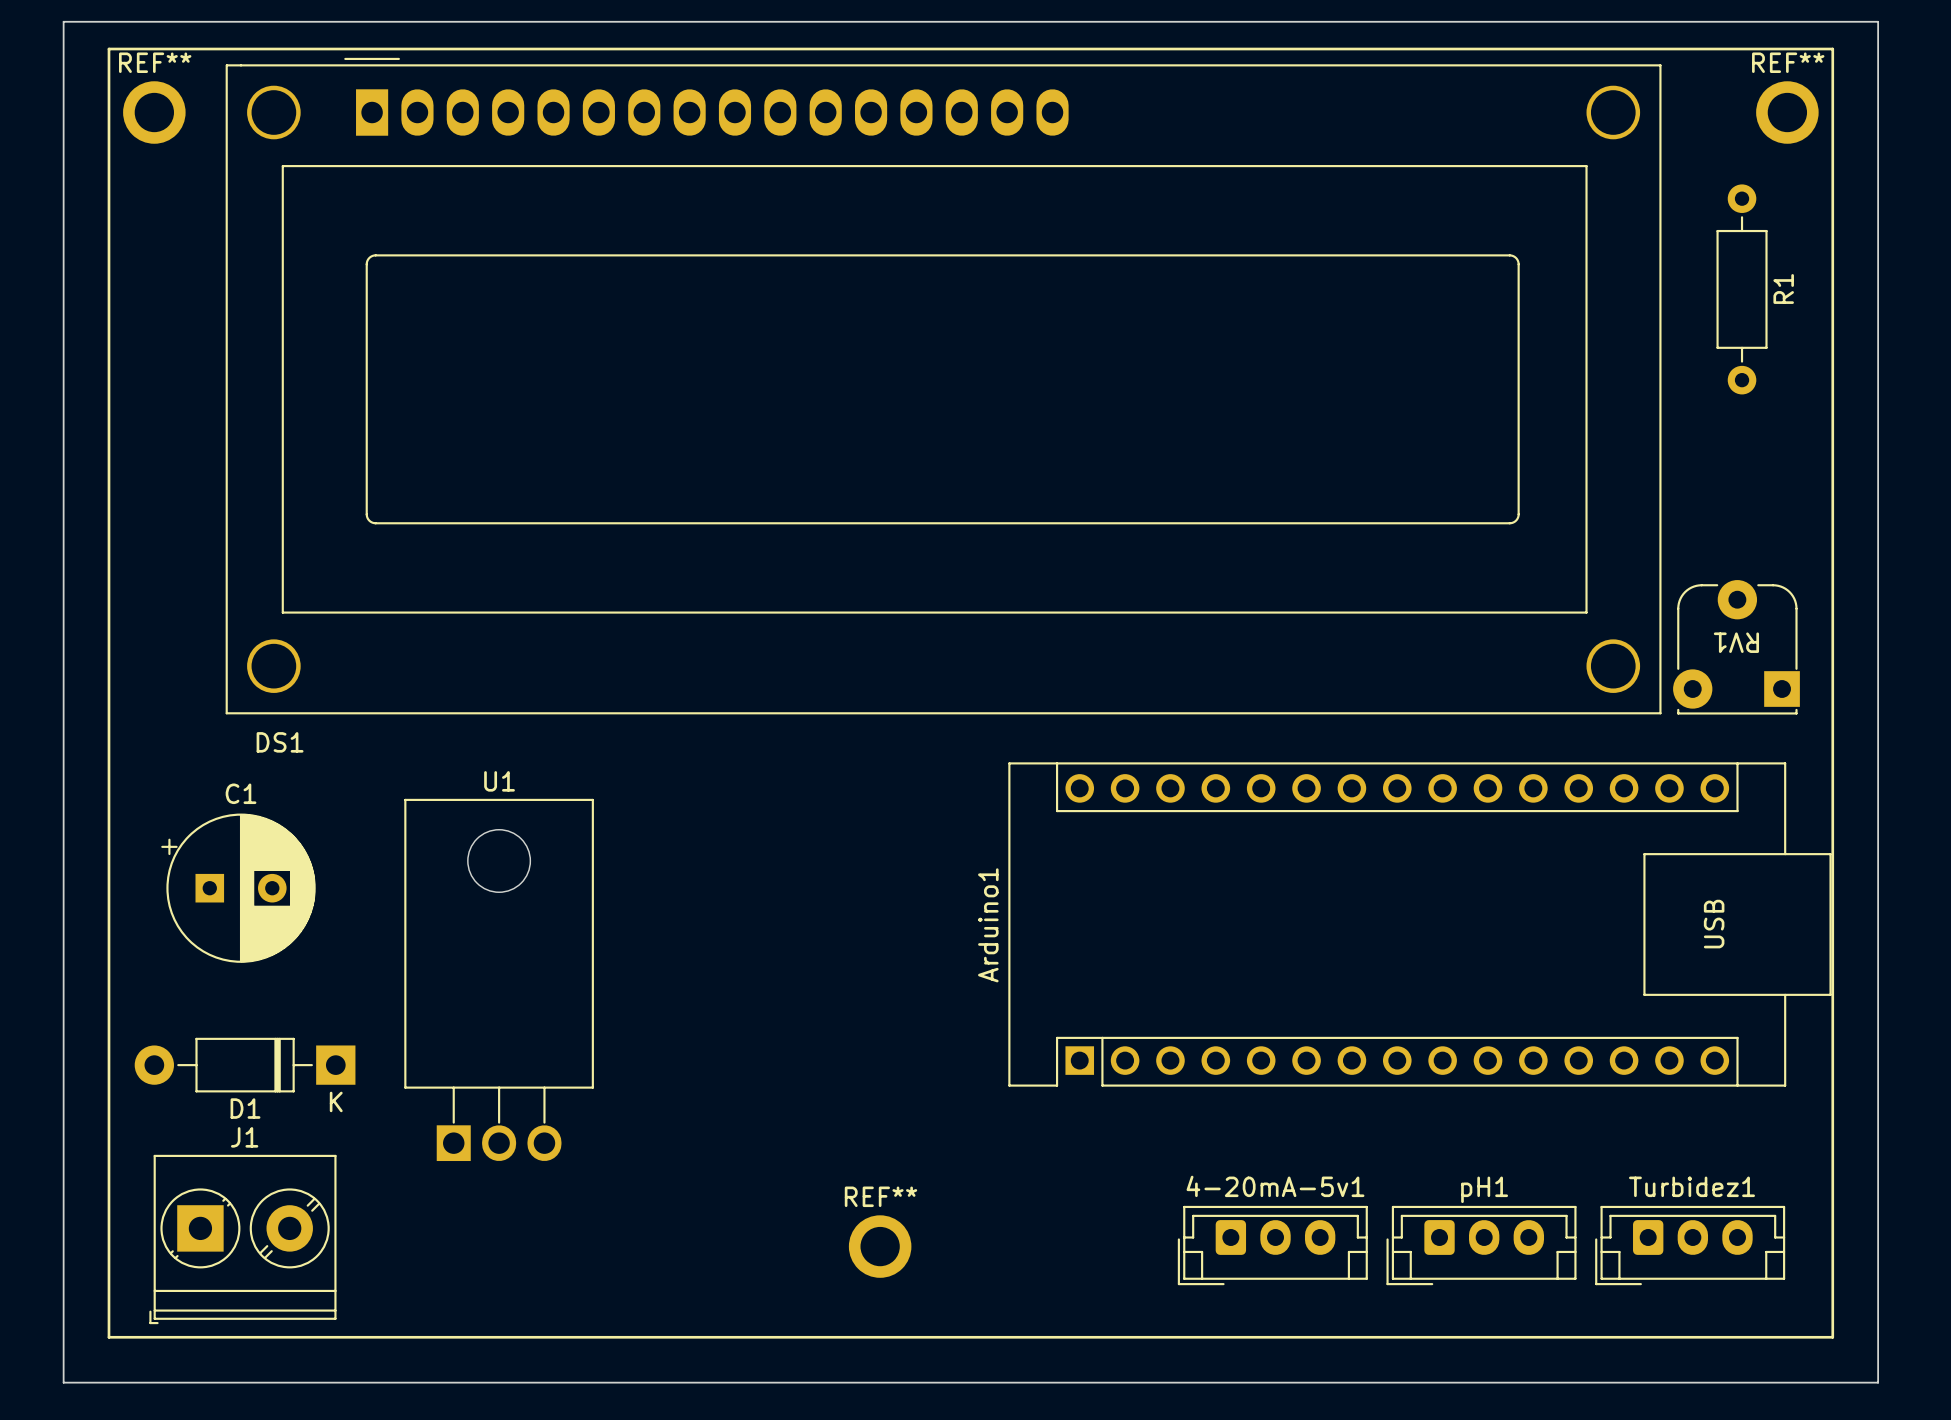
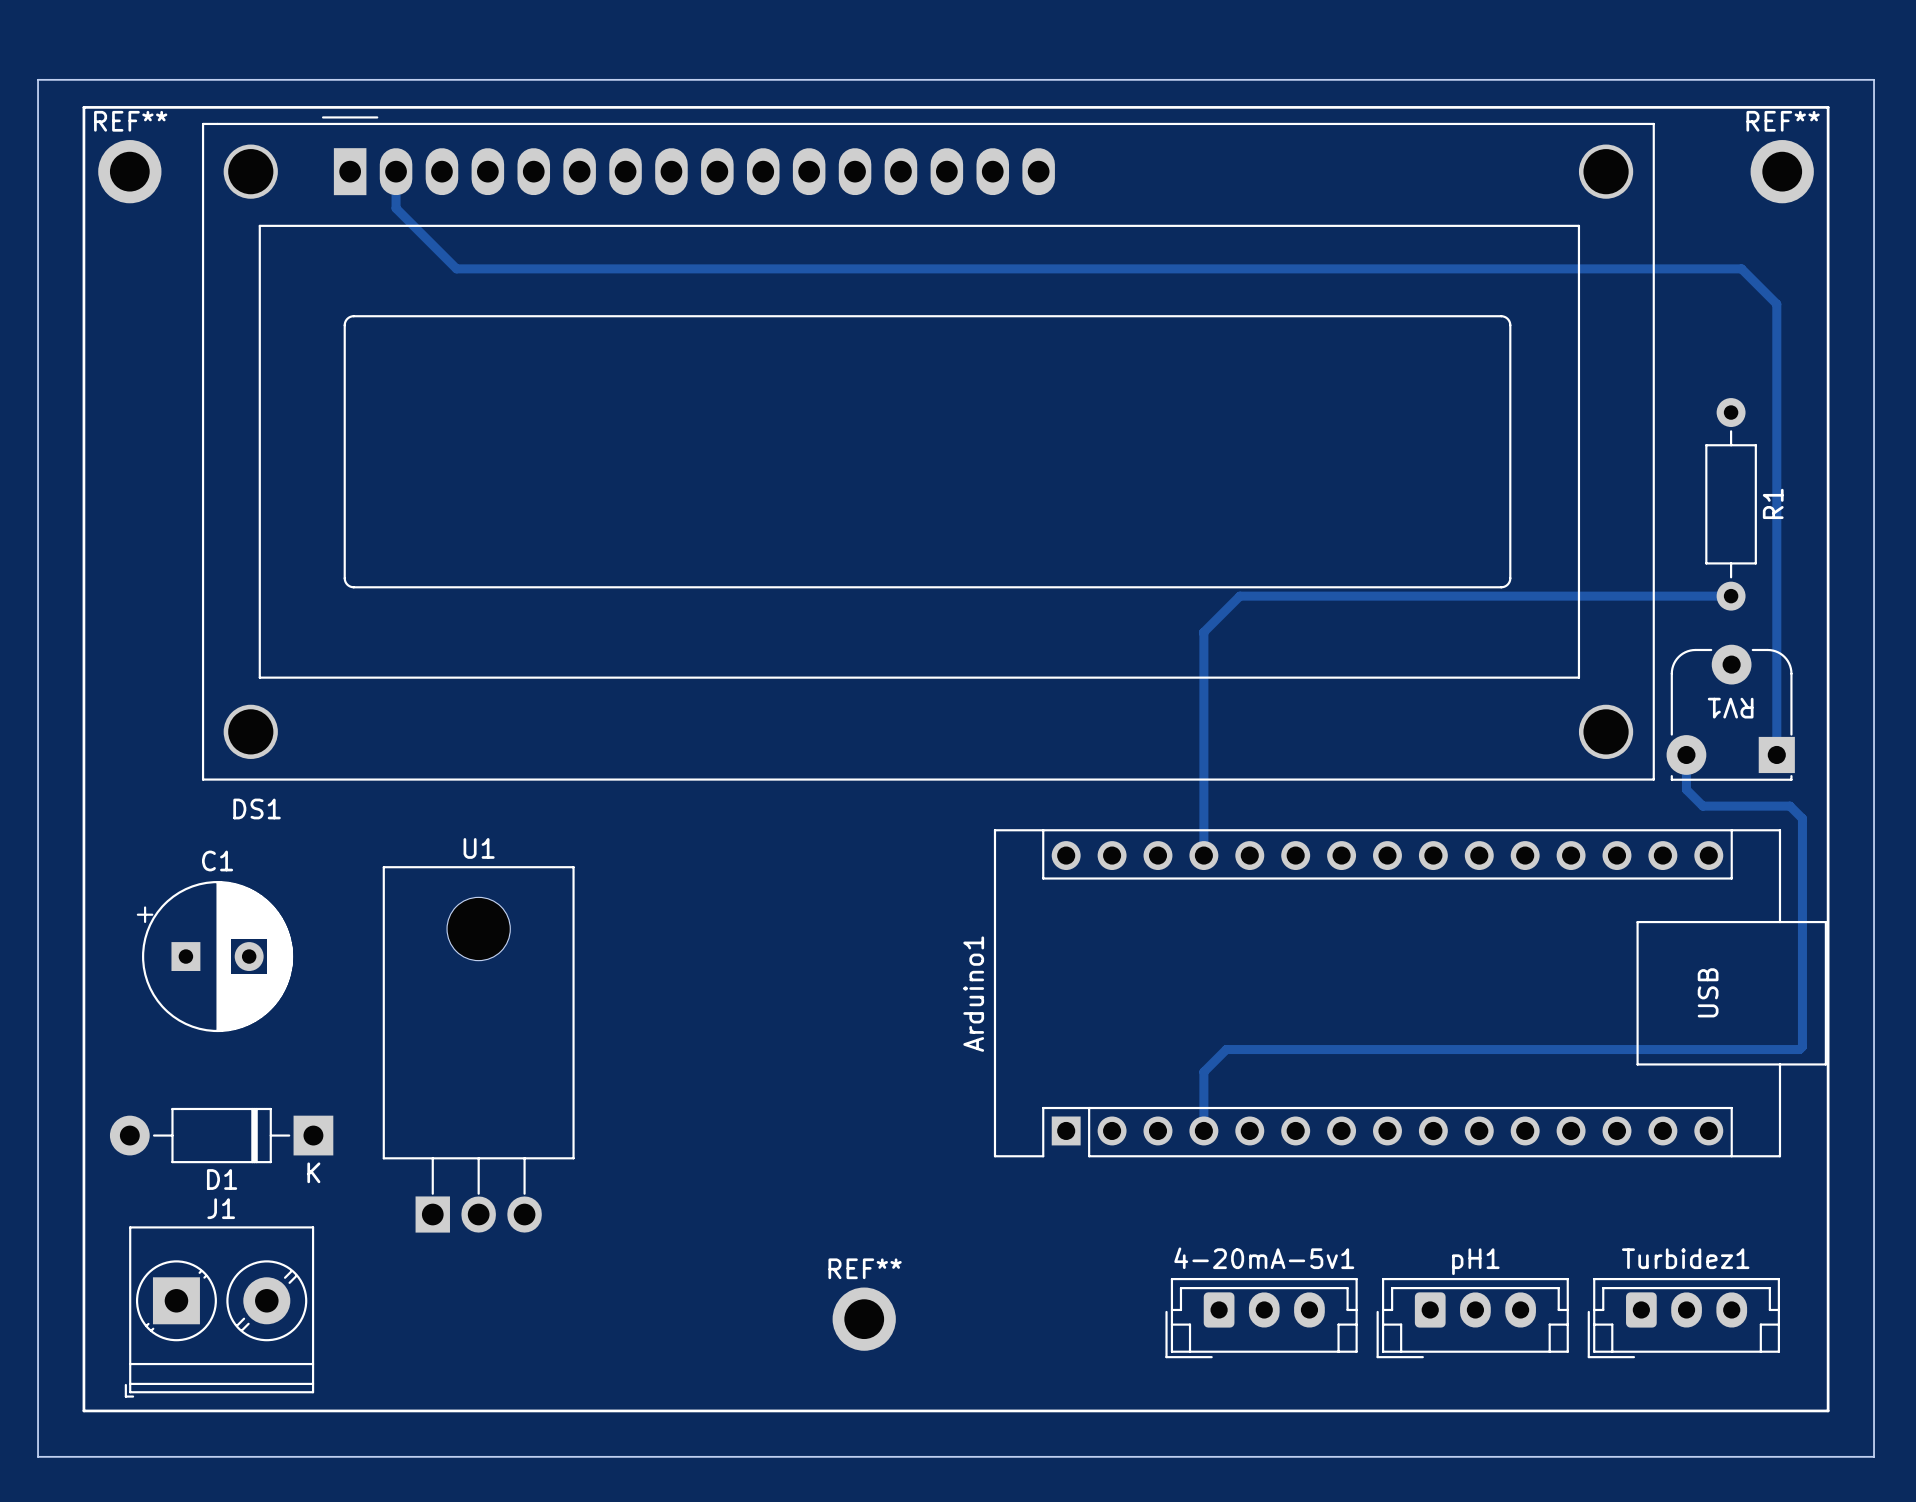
track: none -> (396, 171) (396, 208) (456, 268) (1741, 268) (1776, 304) (1776, 754)
R1 position: (1742, 289) -> (1731, 504)
track: none -> (1731, 596) (1239, 596) (1203, 632) (1203, 855)
track: none -> (1686, 754) (1686, 789) (1702, 806) (1789, 806) (1802, 818) (1802, 1046) (1799, 1049) (1226, 1049) (1203, 1072) (1203, 1130)

